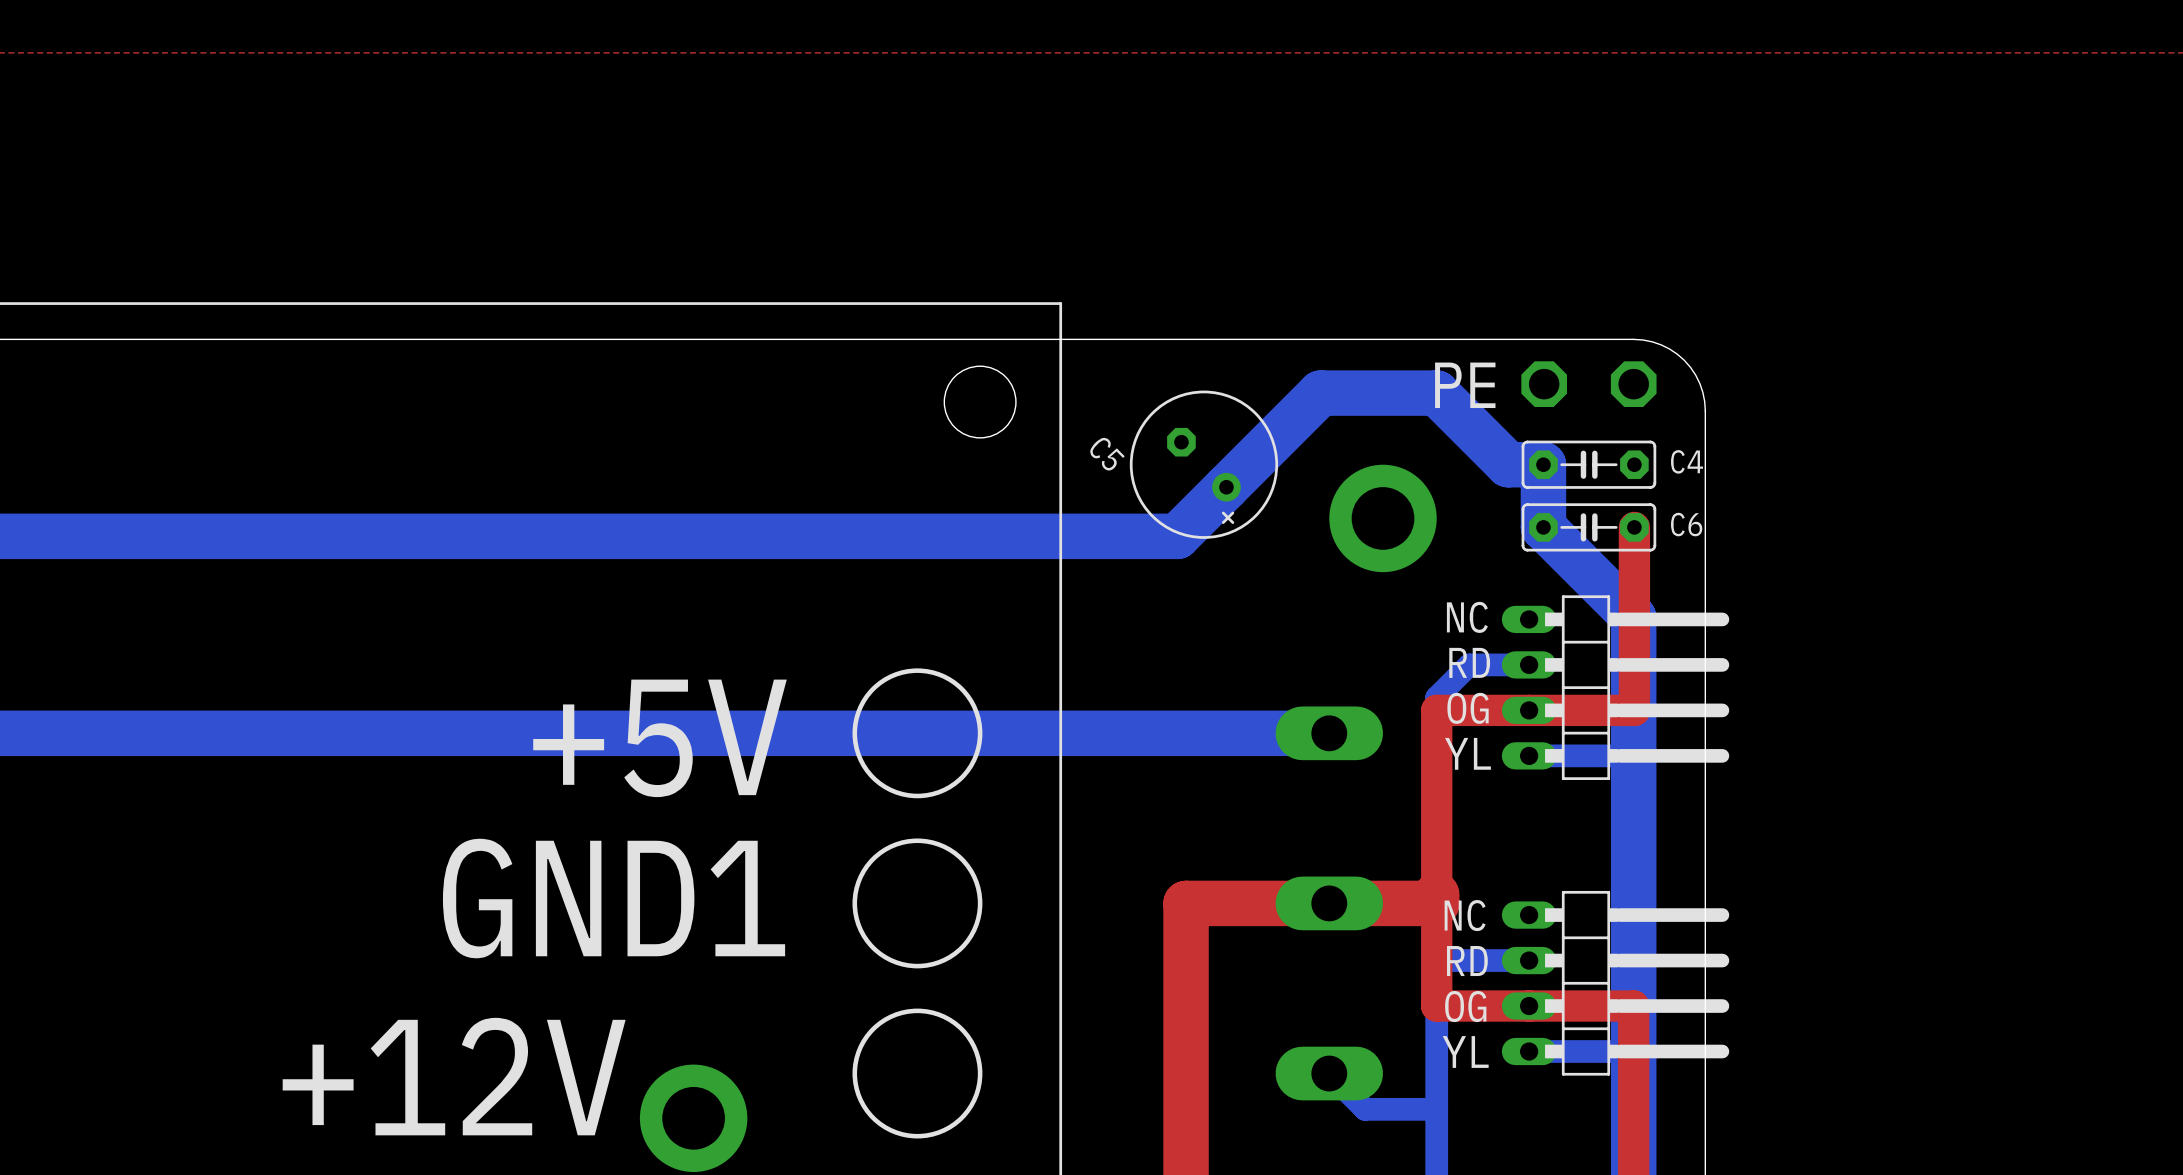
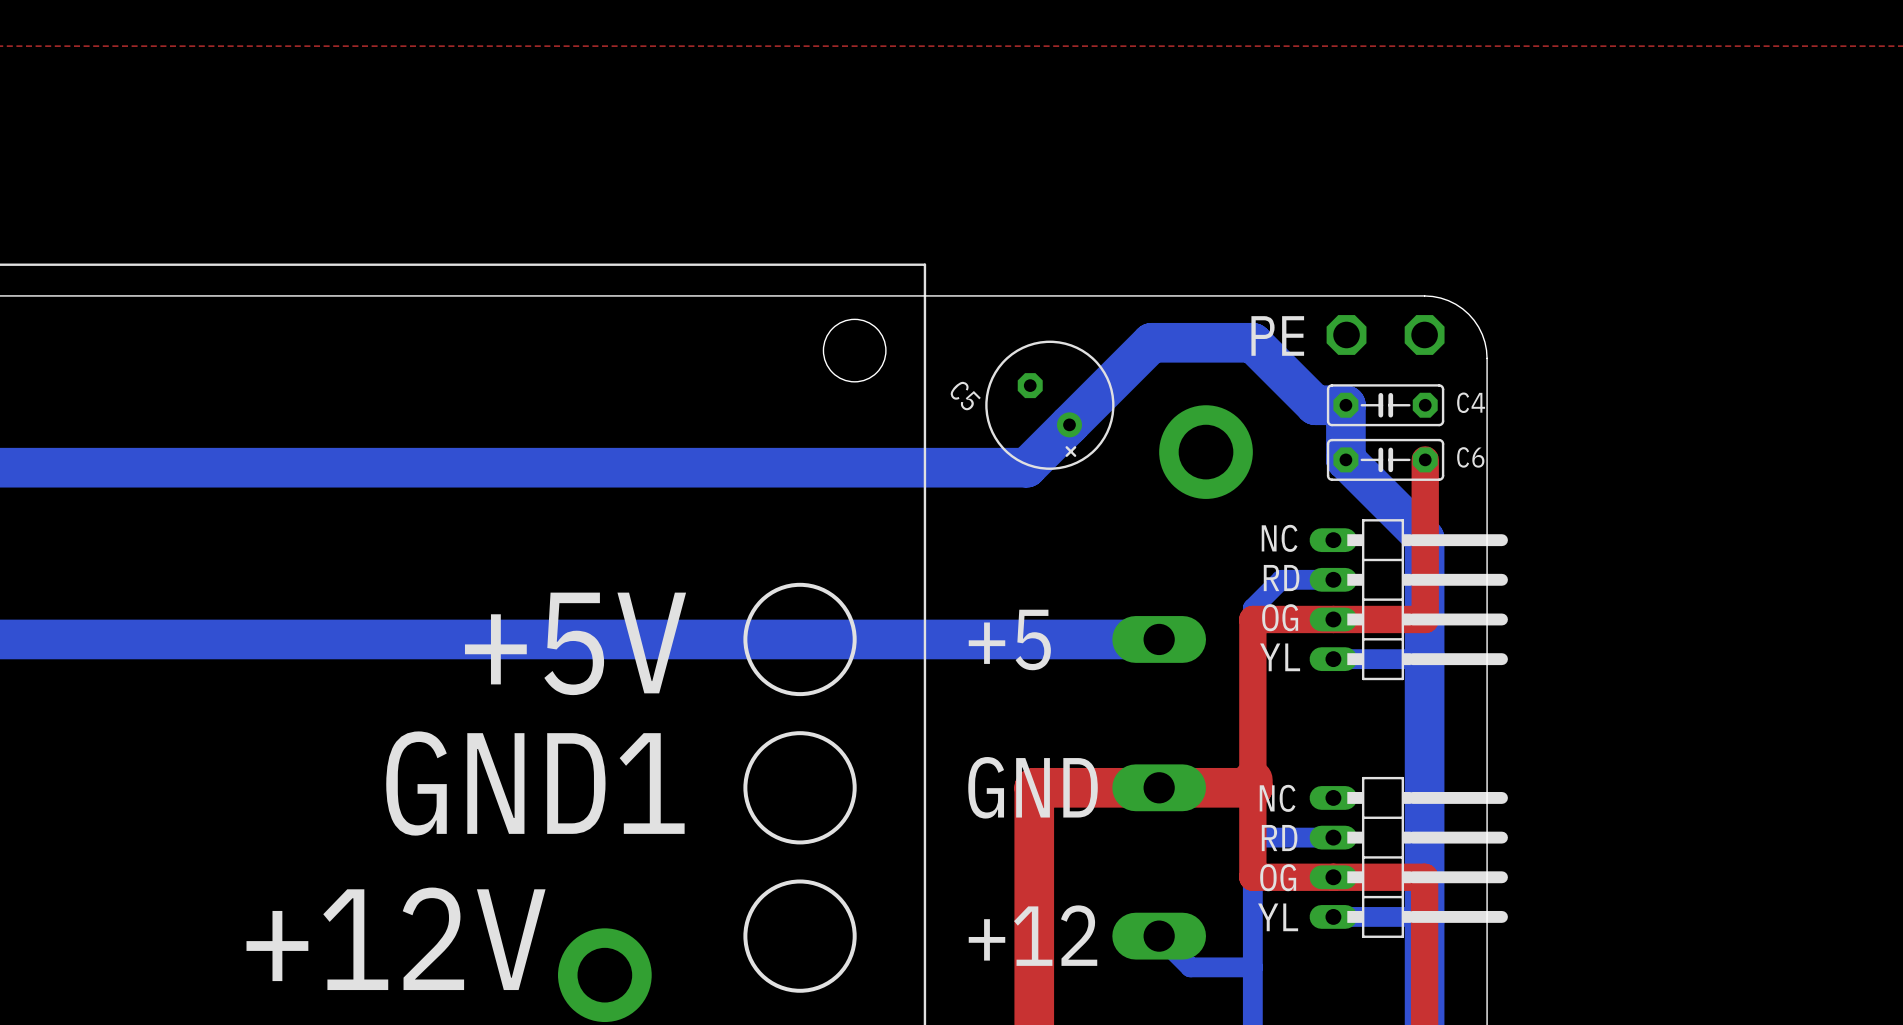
text: none -> +5 (1009, 639)
text: none -> GND (1033, 787)
text: none -> +12 (1032, 935)

